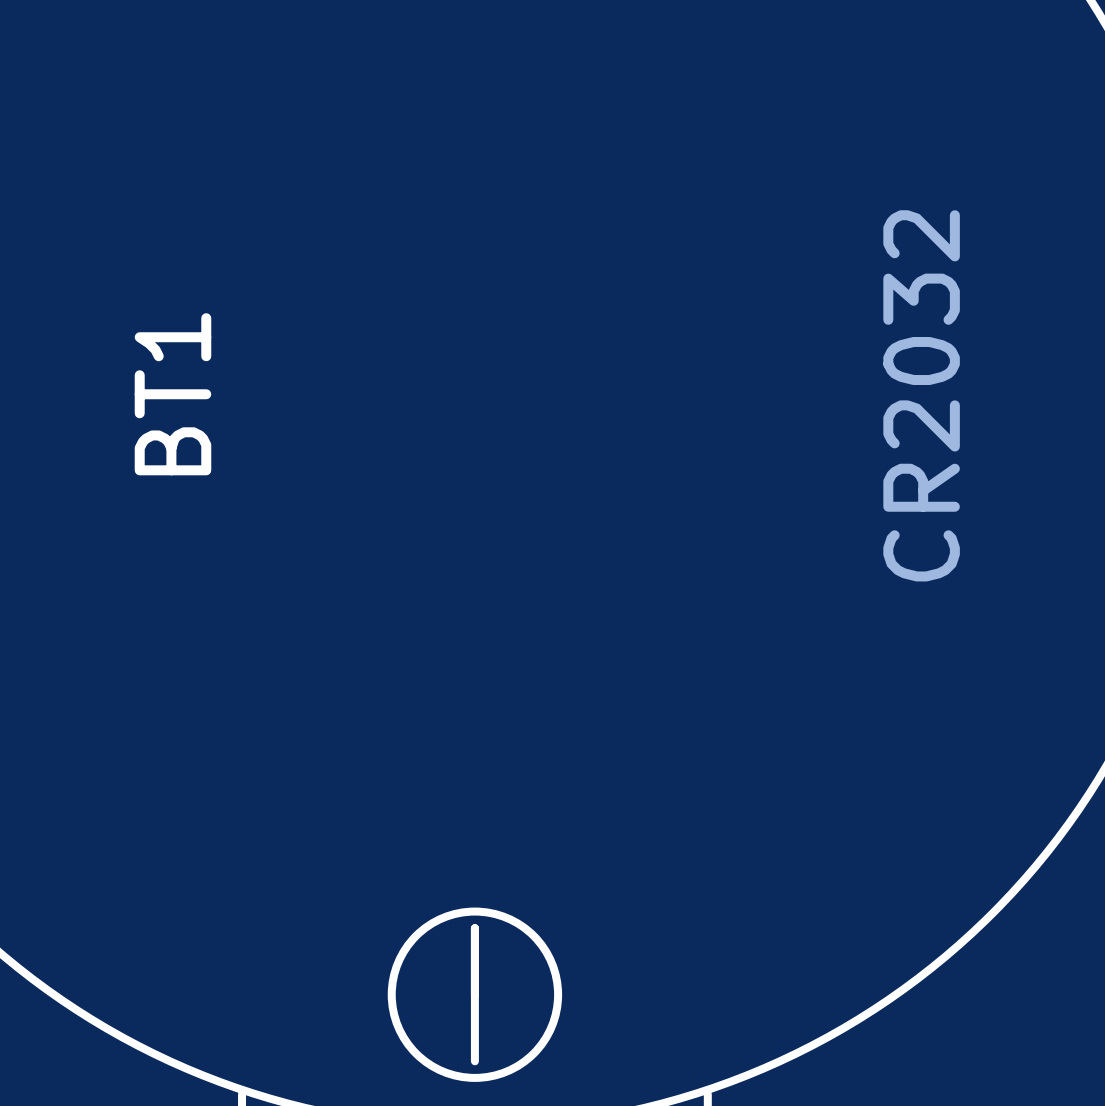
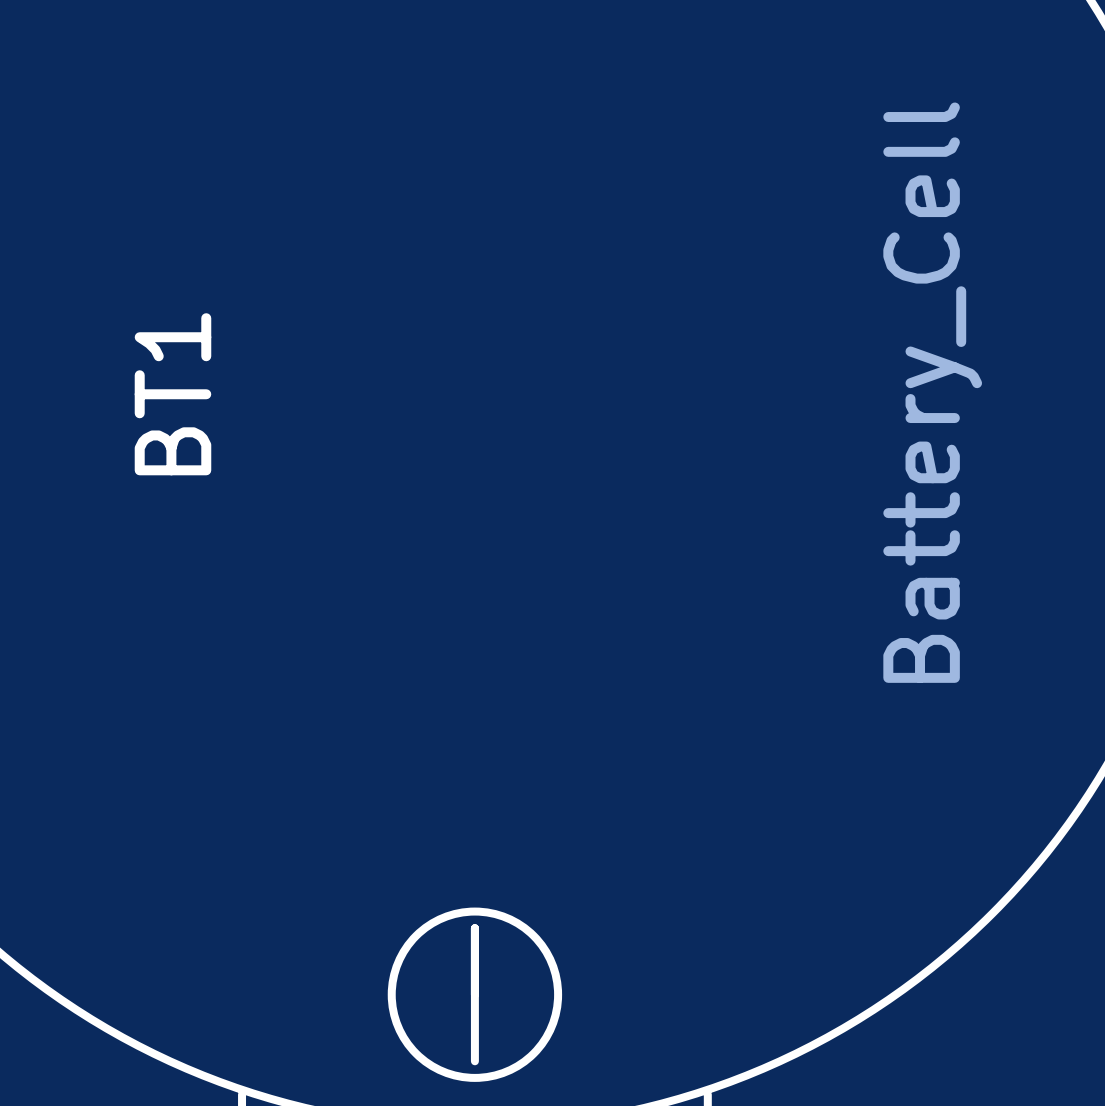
BT1 value: CR2032 (921, 395) -> Battery_Cell (932, 392)

